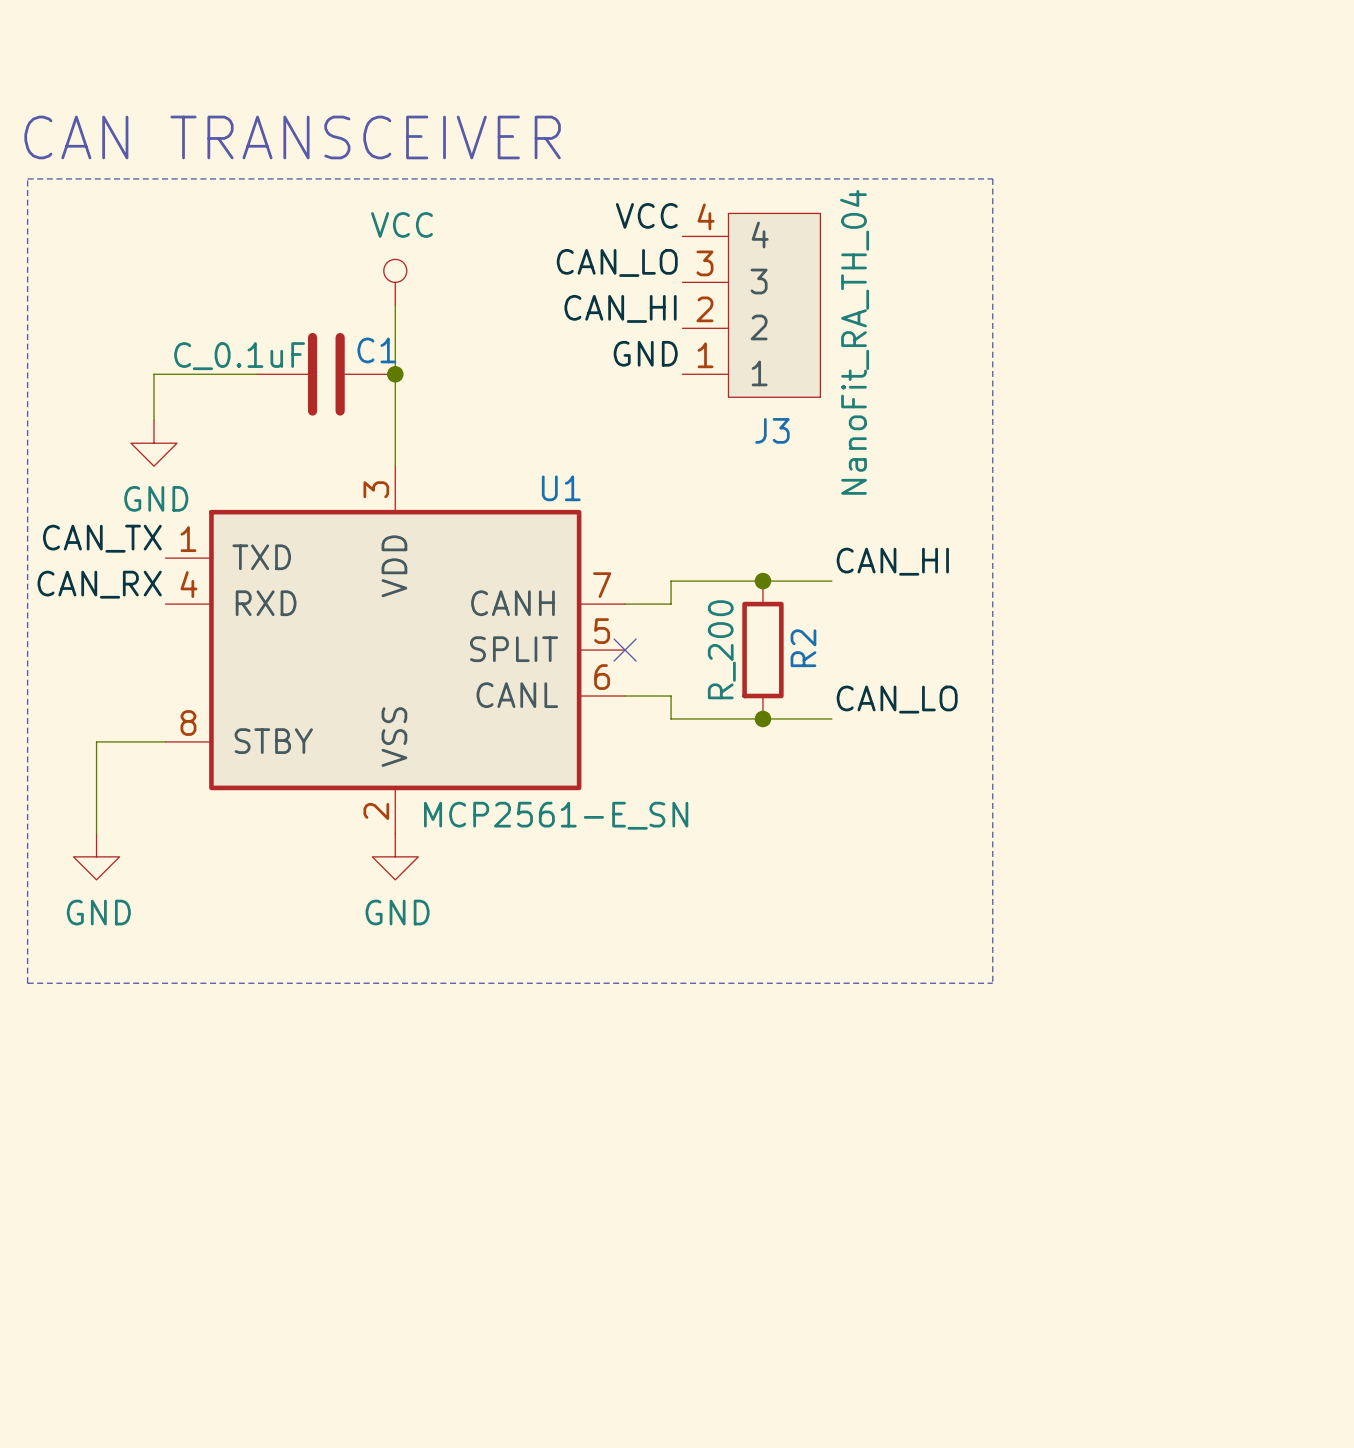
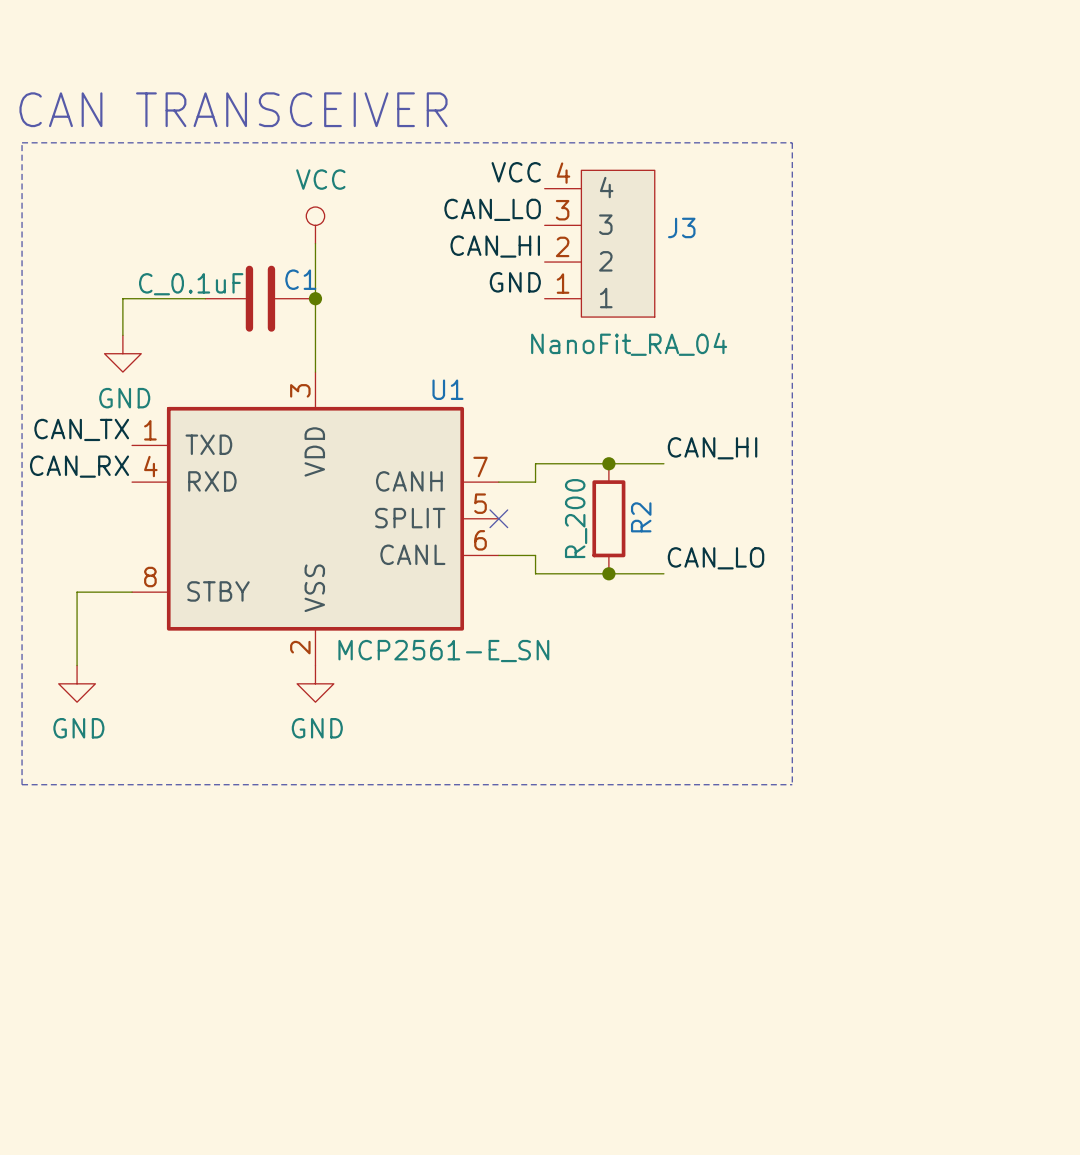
J3 value: NanoFit_RA_TH_04 (854, 342) -> NanoFit_RA_04 (629, 344)
J3 name position: J3 (772, 430) -> J3 (681, 227)

